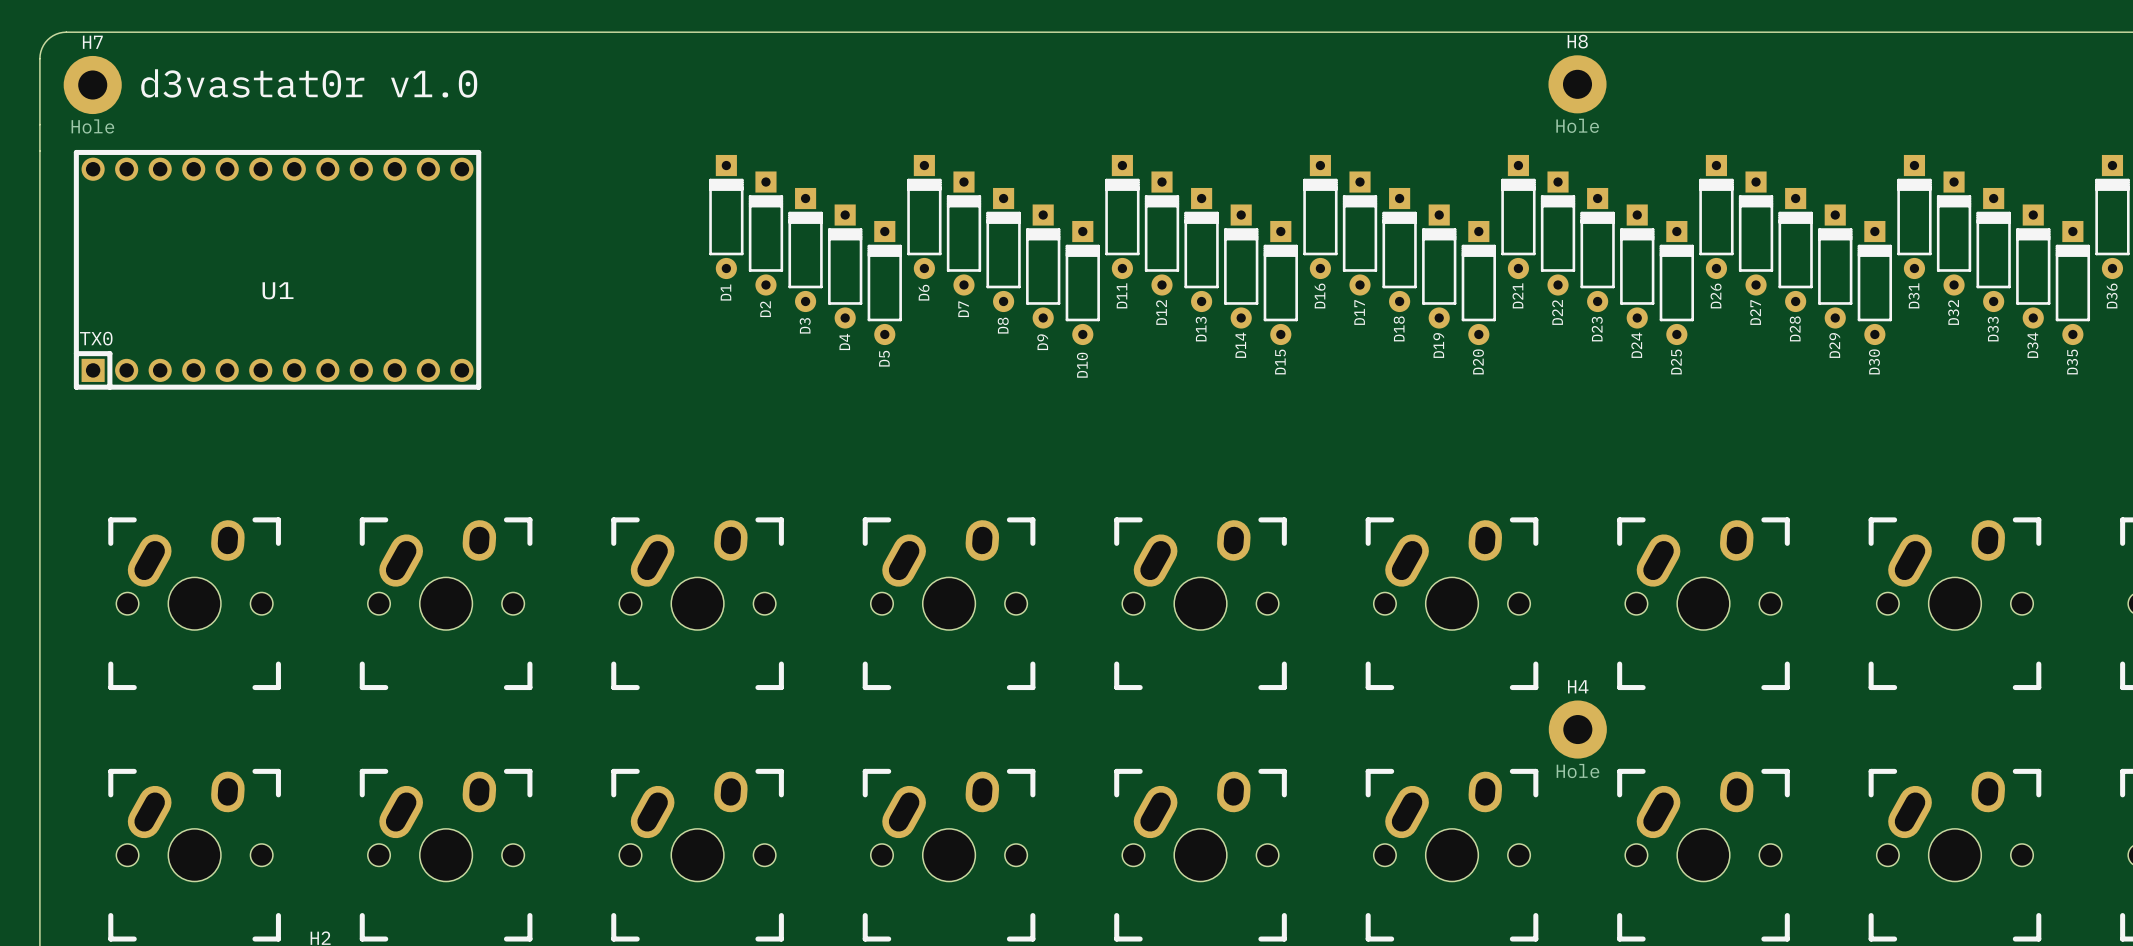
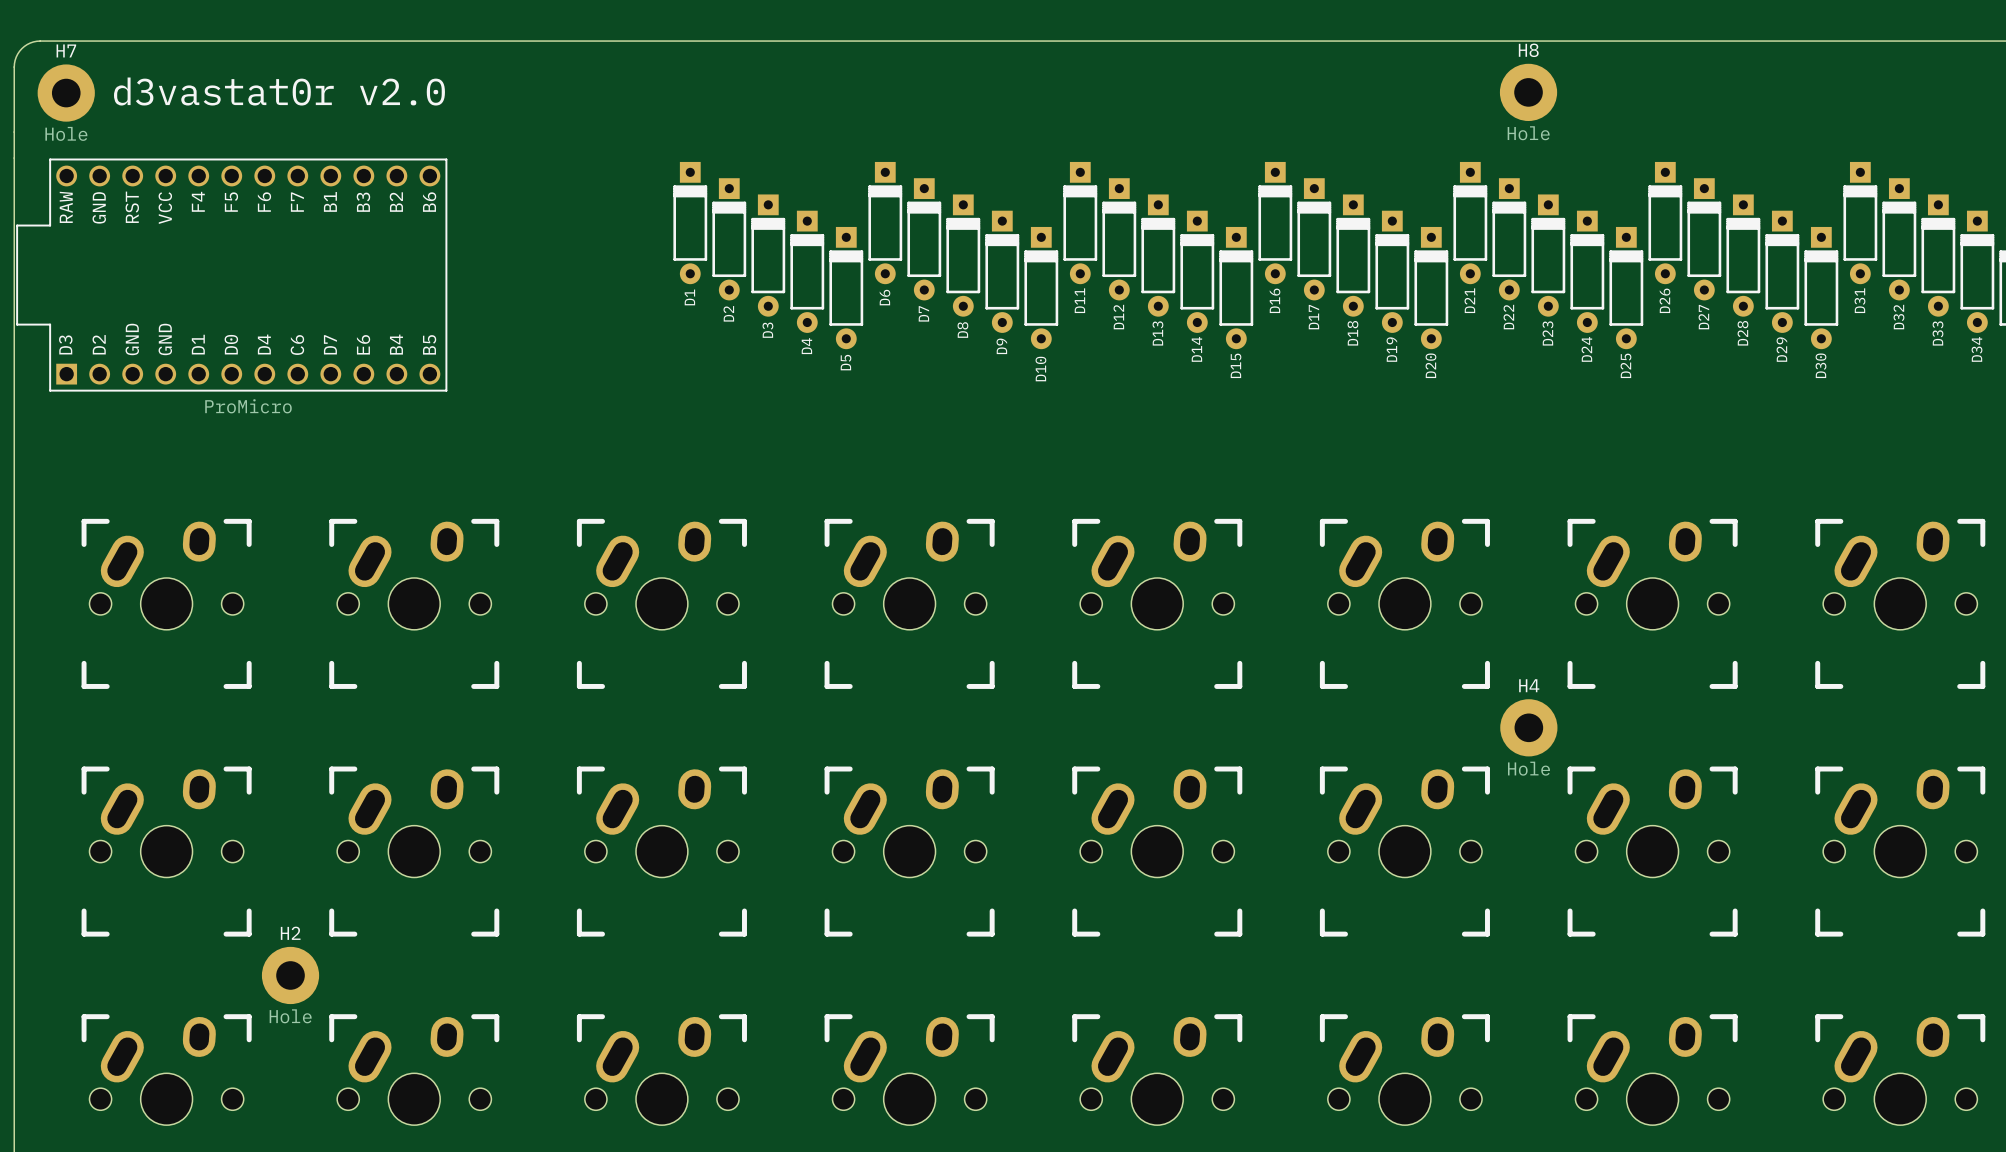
text: d3vastat0r v1.0 (309, 83) -> d3vastat0r v2.0 (279, 91)
text: none -> F4 (198, 201)
text: none -> F5 (231, 202)
text: none -> F6 (264, 202)
text: none -> F7 (297, 202)
text: none -> B1 (330, 201)
text: none -> B3 (363, 202)
text: none -> B2 (396, 202)
text: none -> B6 (429, 202)
text: none -> RST (132, 207)
text: none -> RAW (66, 207)
text: none -> GND (99, 207)
text: none -> VCC (165, 208)
part: none -> ProMicro (231, 275)
U1: (277, 269) -> none
text: none -> GND (132, 339)
text: none -> GND (165, 339)
text: TX0 (96, 338) -> none
text: none -> D3 (65, 344)
text: none -> D2 (99, 344)
text: none -> D1 (198, 344)
text: none -> D0 (231, 344)
text: none -> D4 (264, 344)
text: none -> C6 (297, 345)
text: none -> D7 (330, 344)
text: none -> E6 (363, 344)
text: none -> B4 (396, 344)
text: none -> B5 (429, 344)

